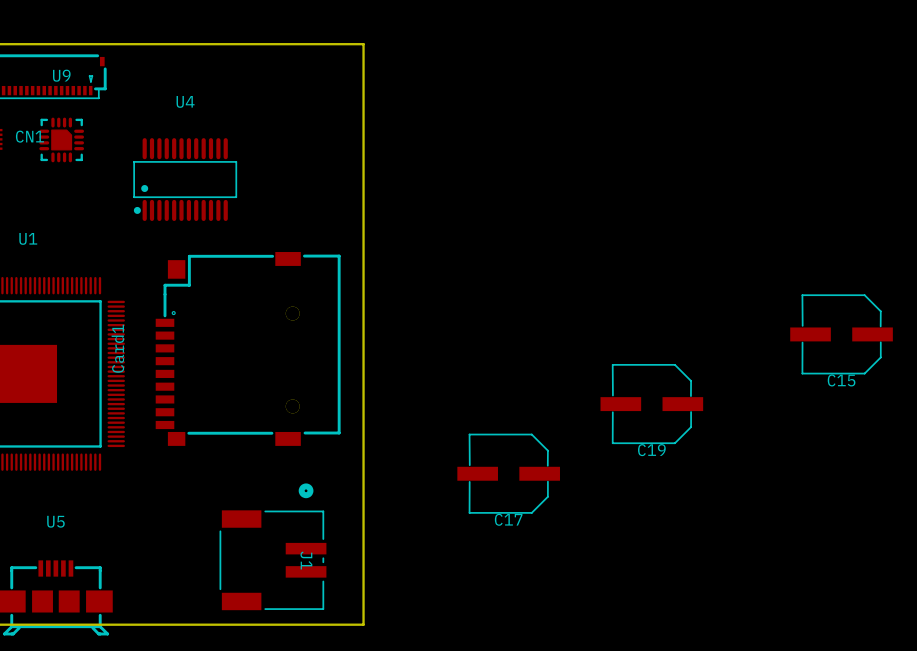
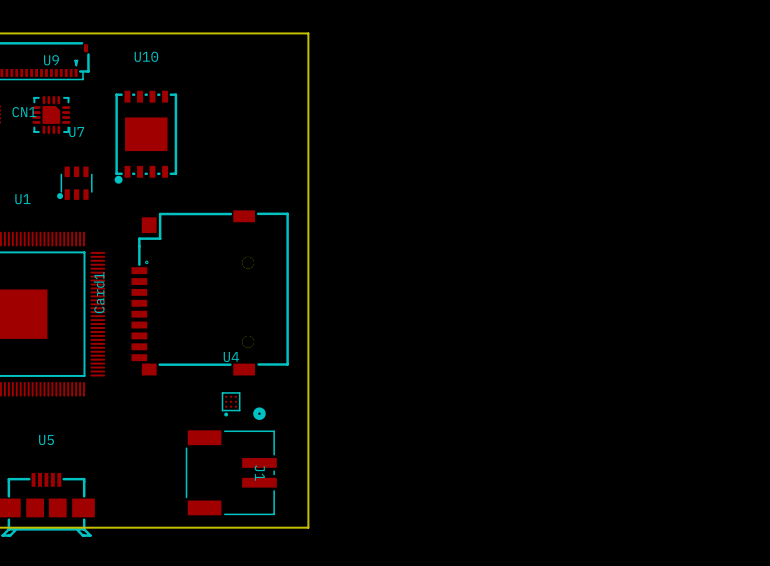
U4 footprint: [133, 138, 238, 222] -> [221, 392, 241, 417]
U10: none -> (145, 137)
U7: none -> (74, 183)
C15: (841, 334) -> none
C19: (651, 404) -> none
C17: (508, 473) -> none

